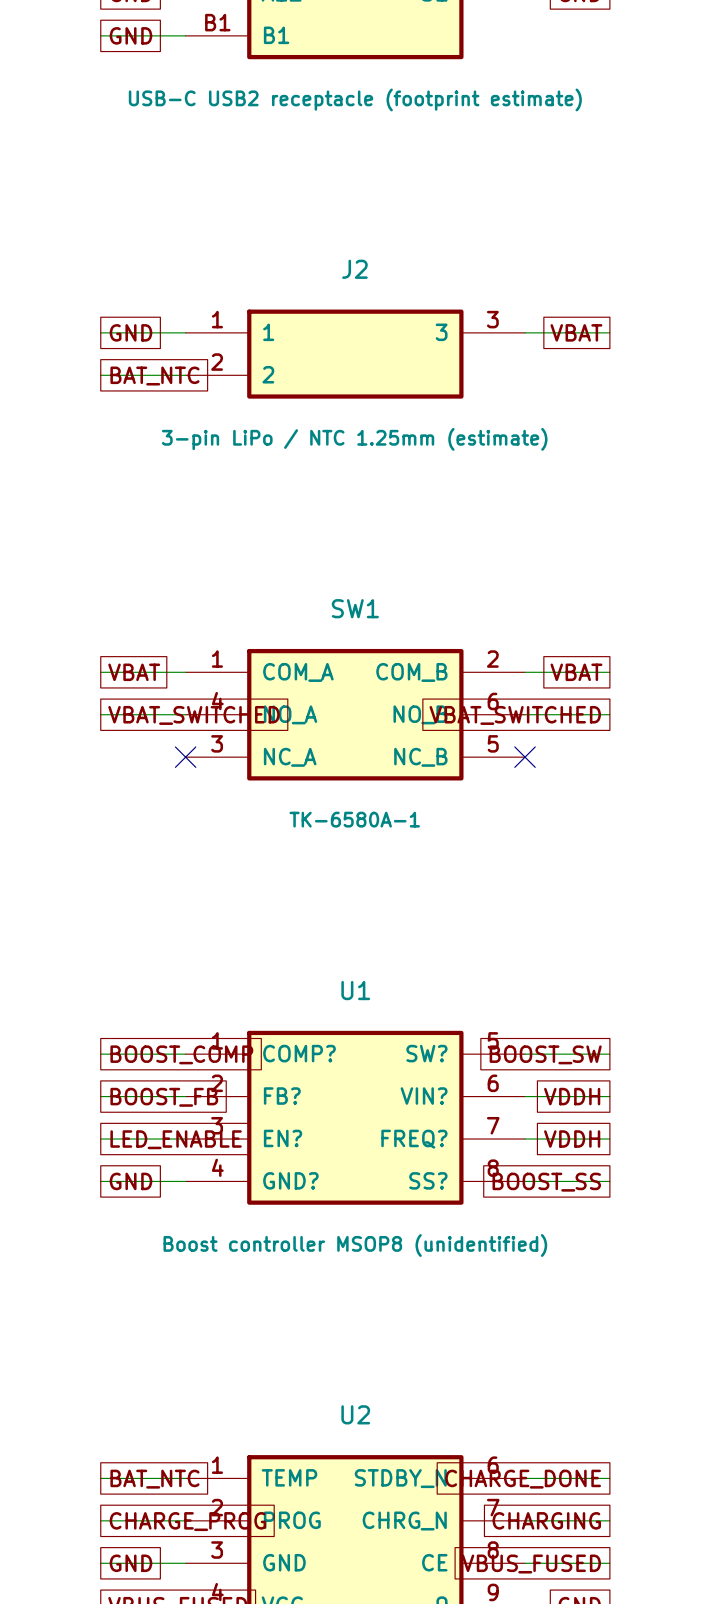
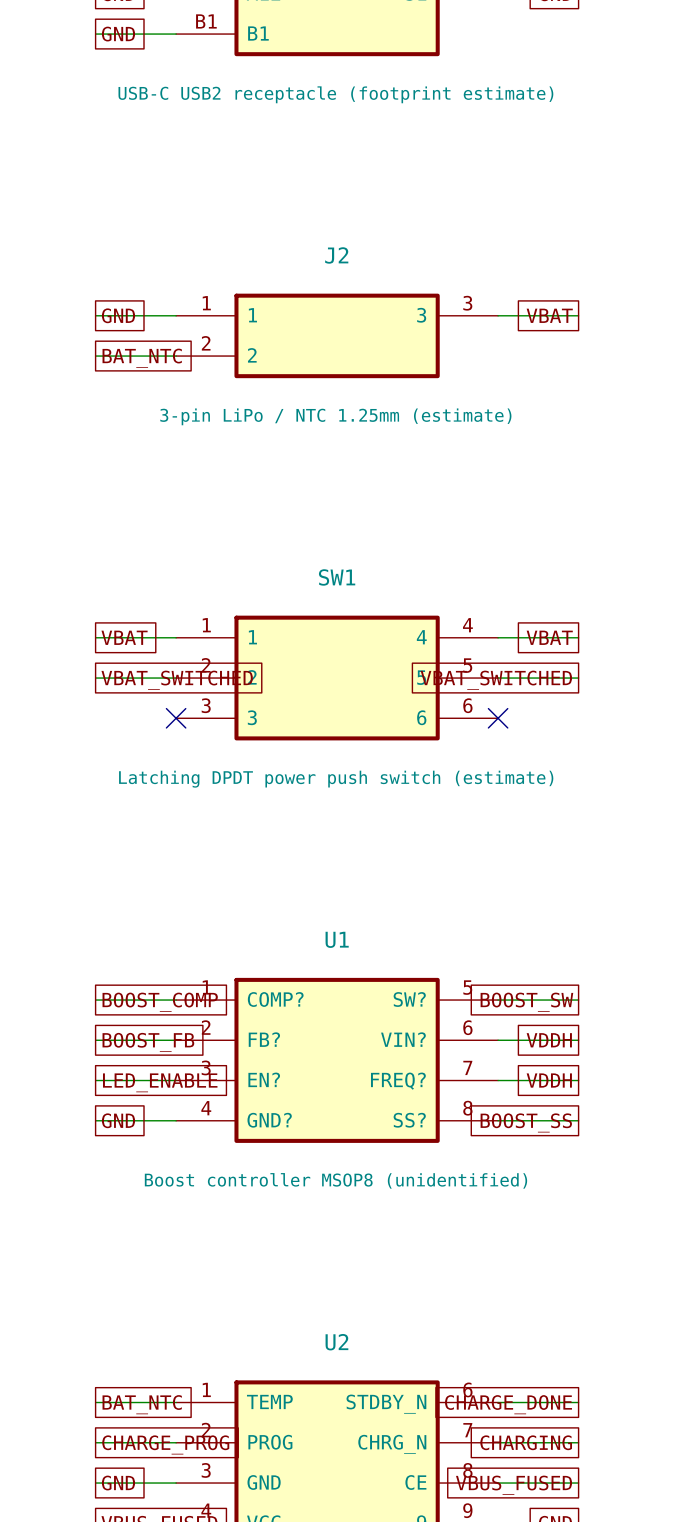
SW1 symbol: [185, 648, 526, 781] -> [176, 615, 499, 741]
SW1 value: TK-6580A-1 (354, 819) -> Latching DPDT power push switch (estimate) (336, 779)

